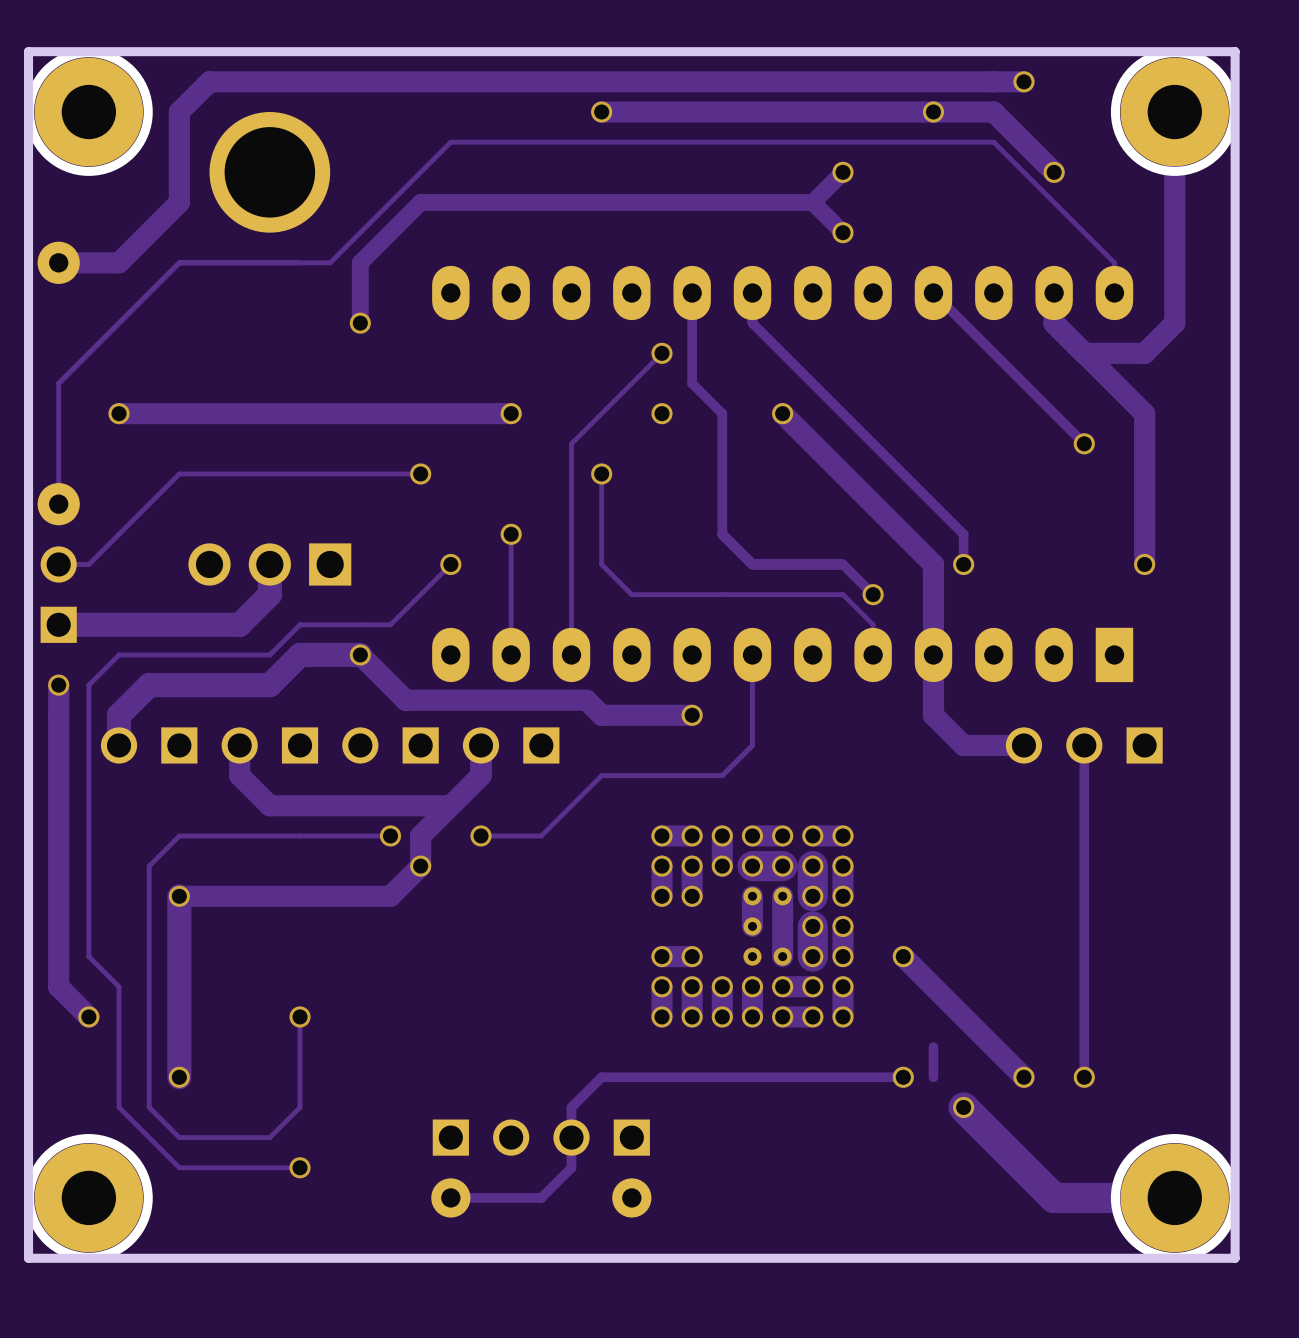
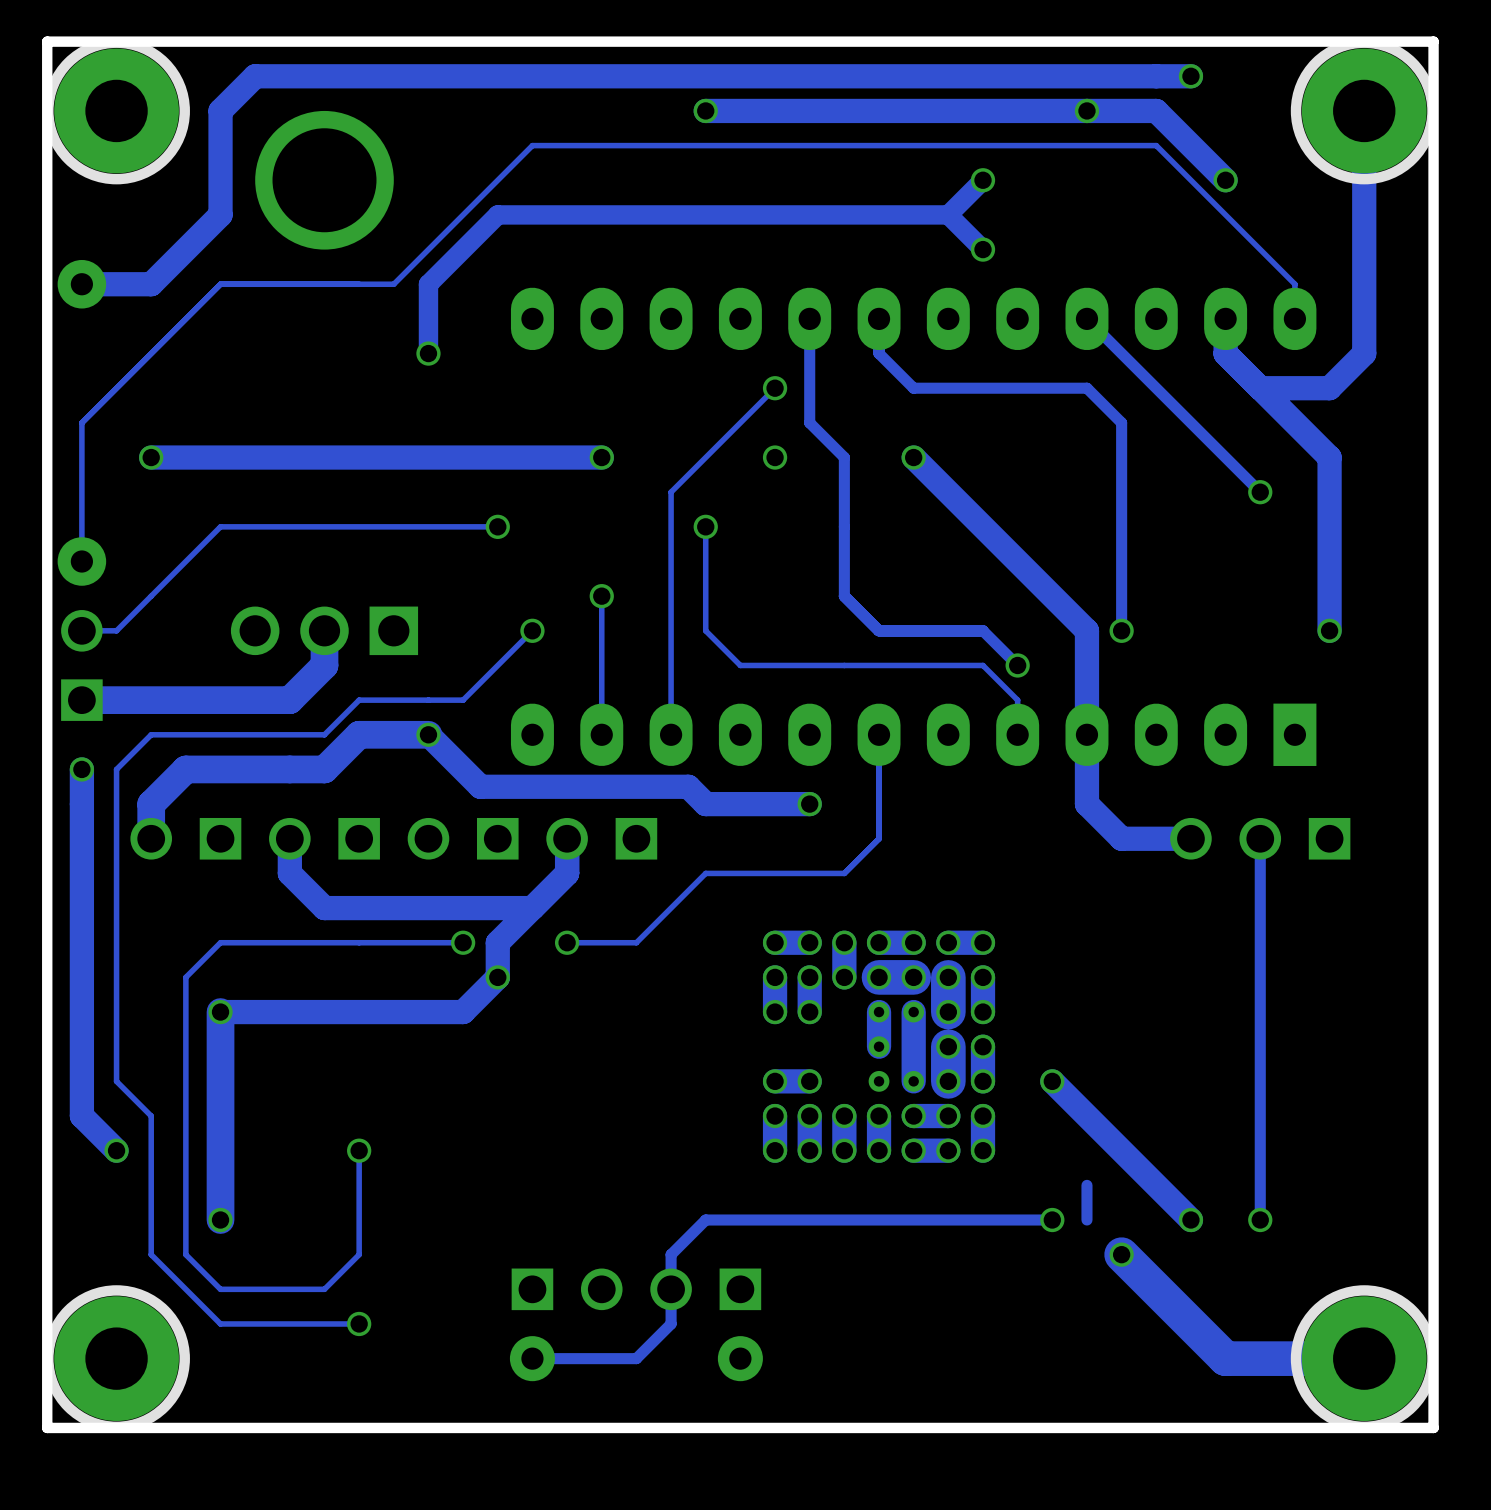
track: (782, 353) (963, 534) -> (913, 388) (1086, 388) (1121, 422) (1121, 596)

